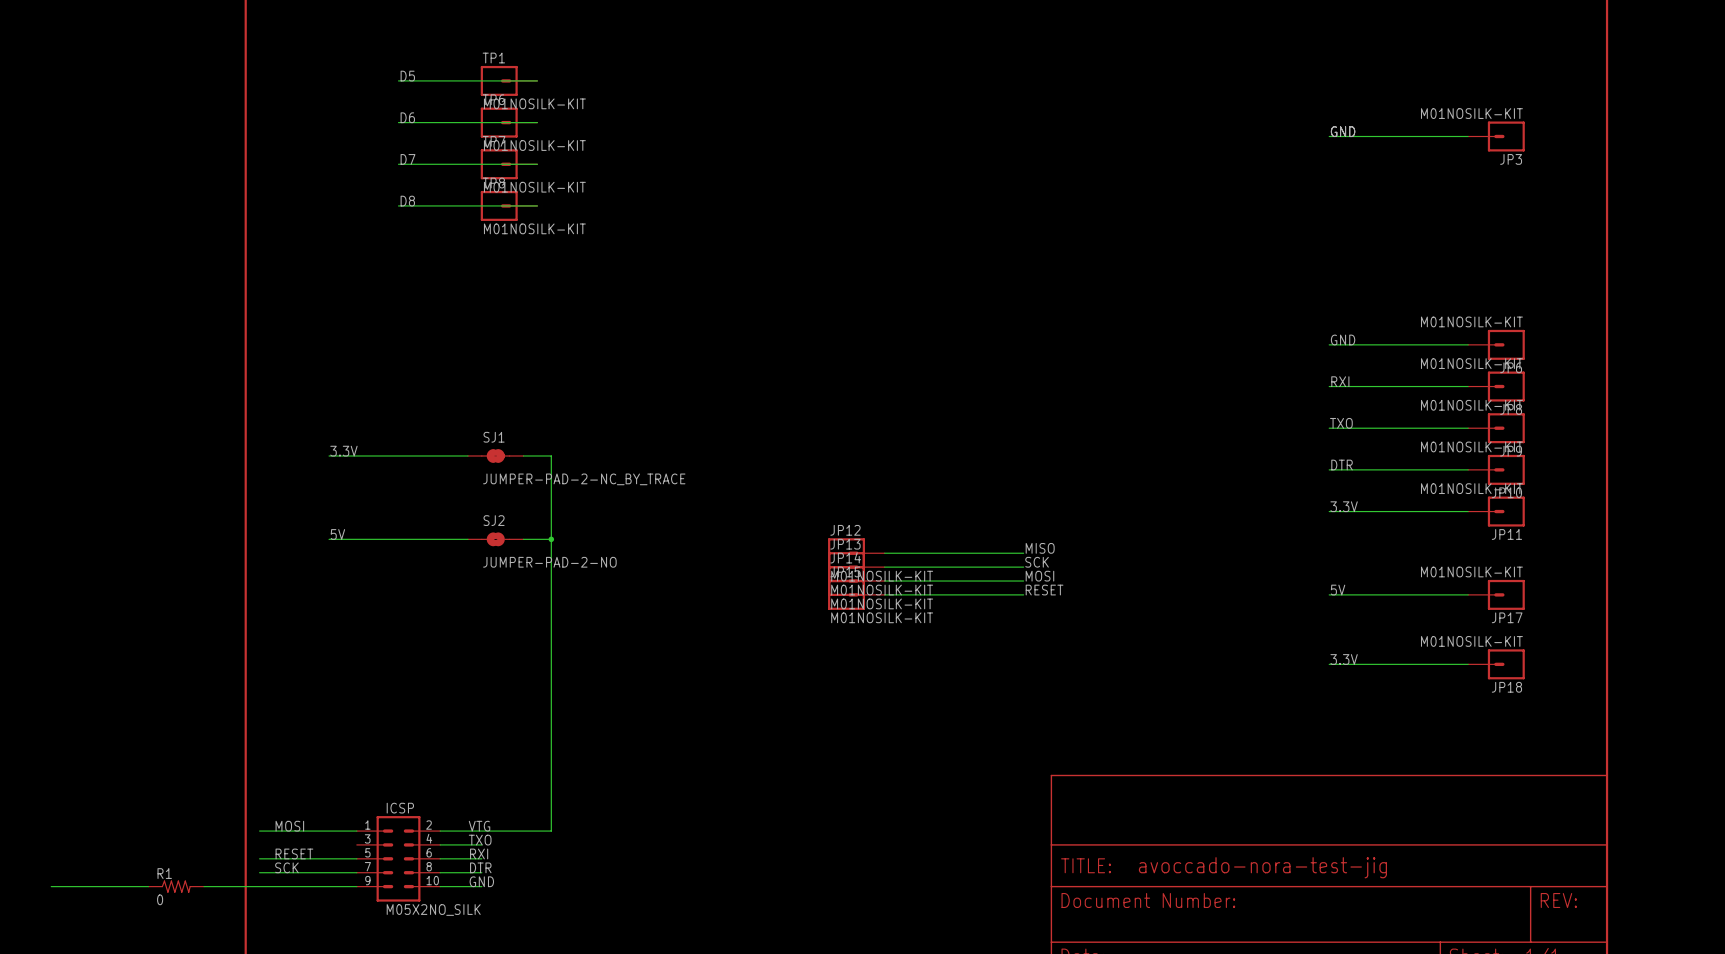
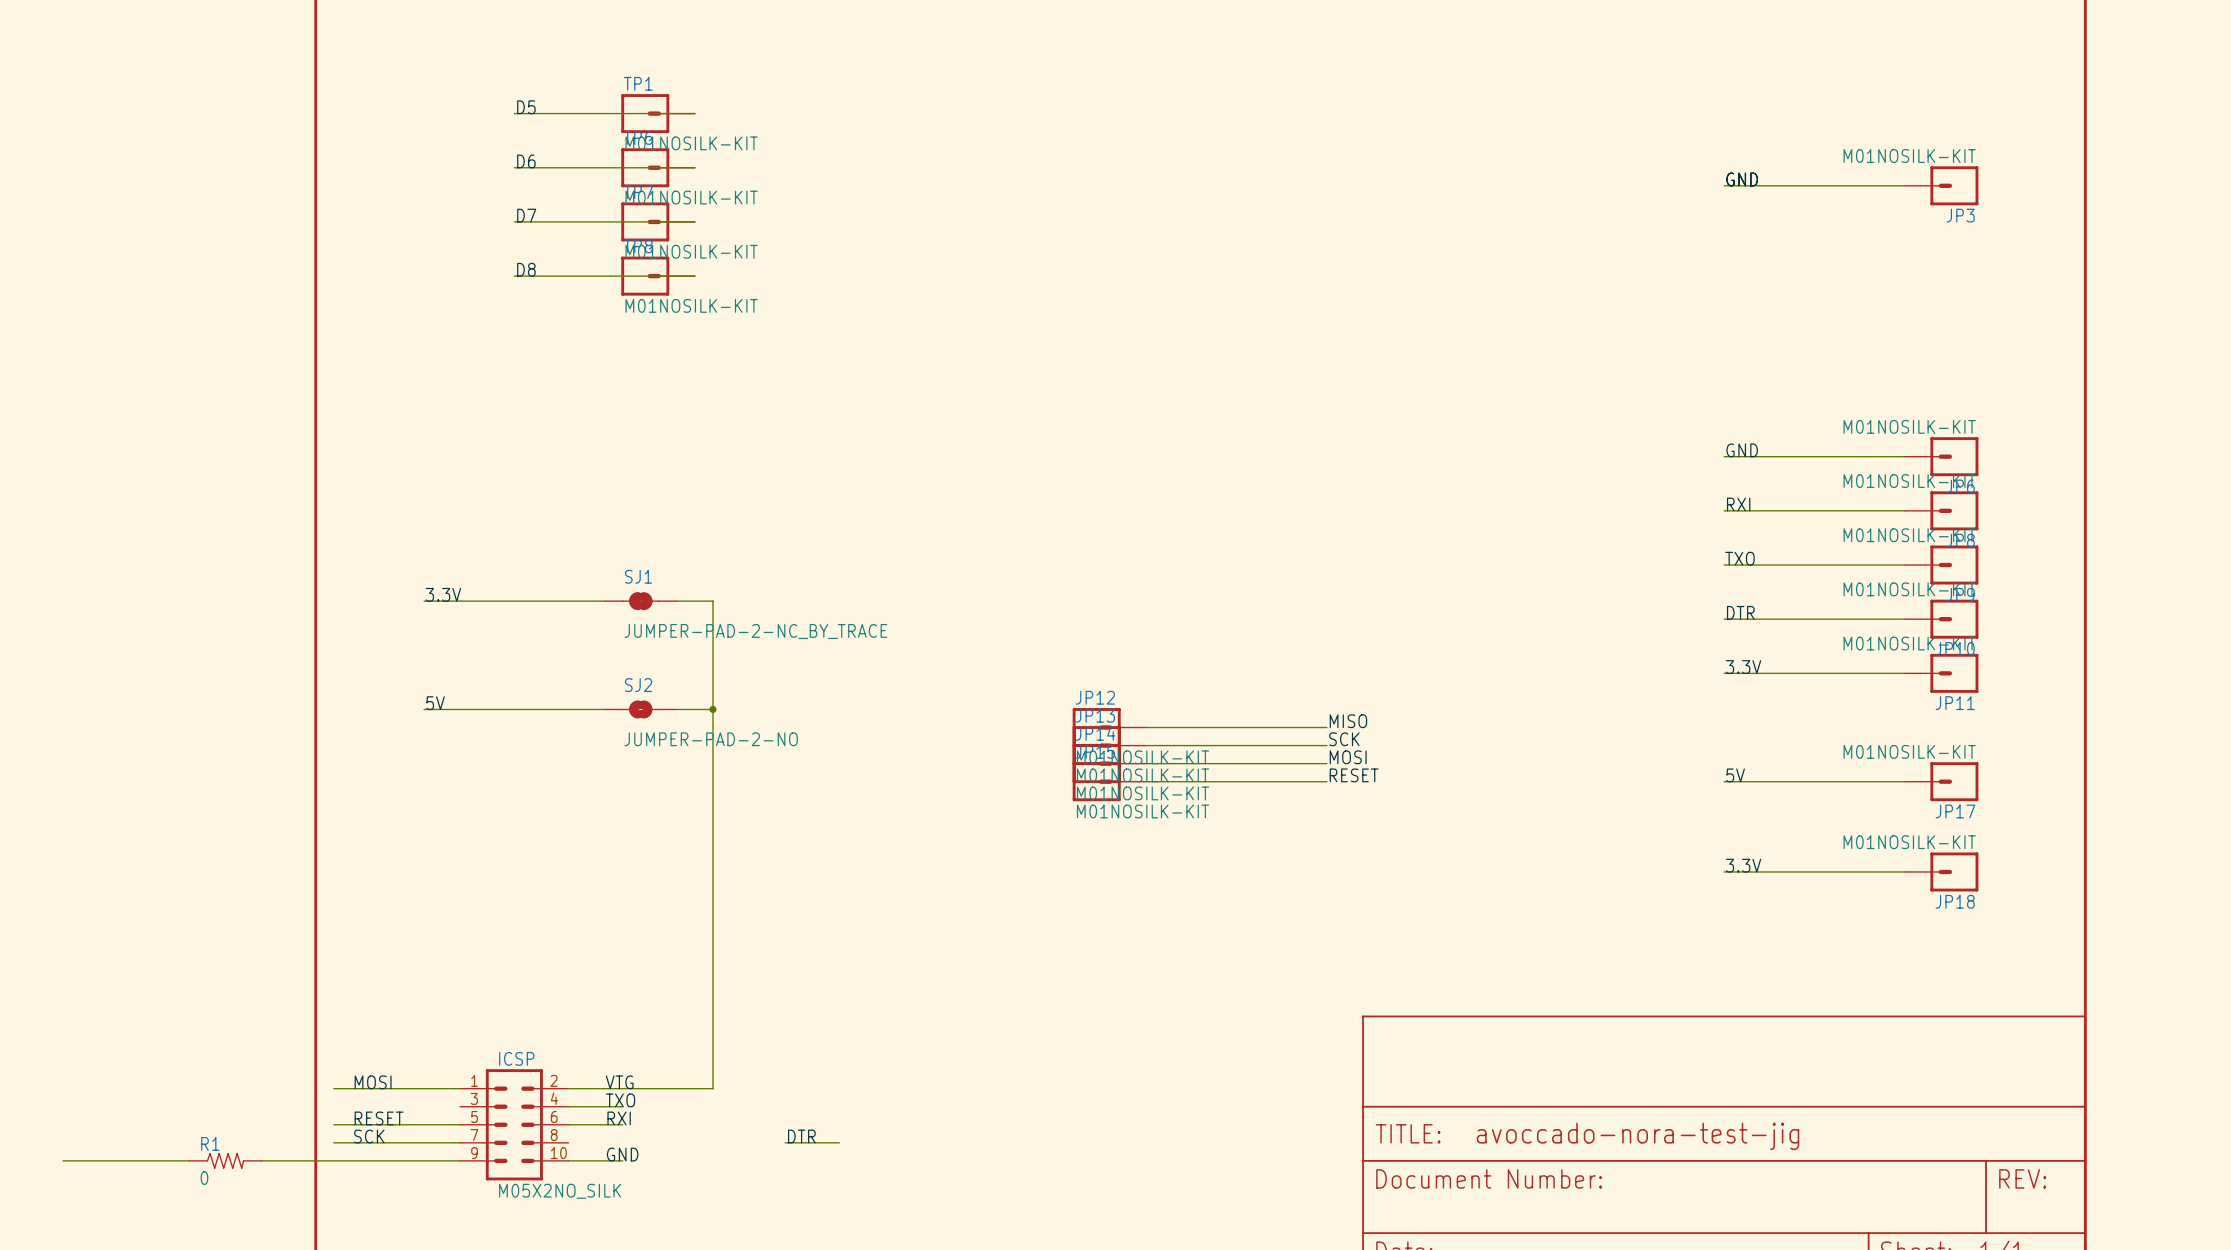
label: DTR (480, 867) -> none
label: none -> DTR (801, 1136)
wire: (440, 872) (481, 872) -> none
wire: none -> (785, 1142) (839, 1142)

